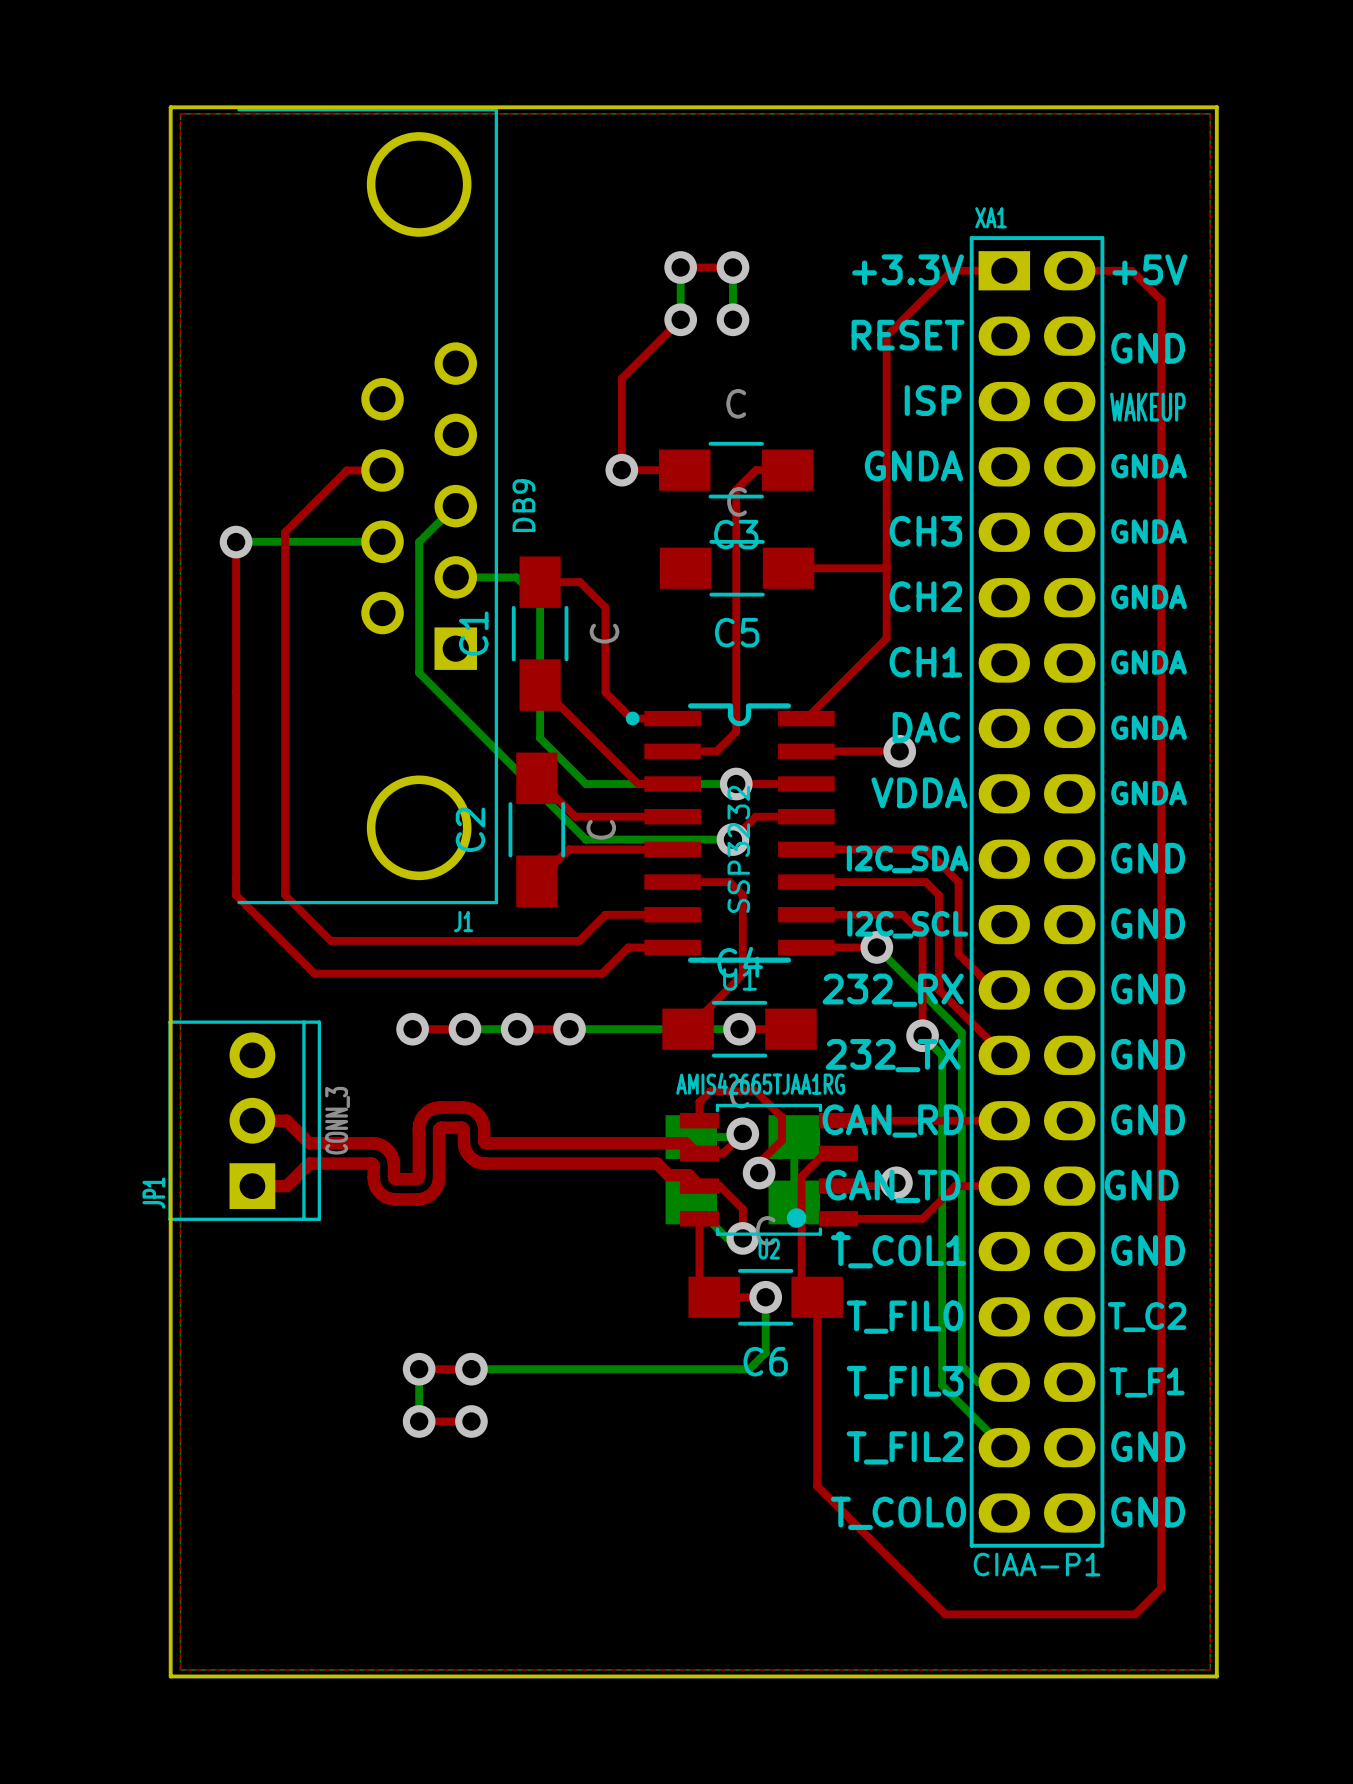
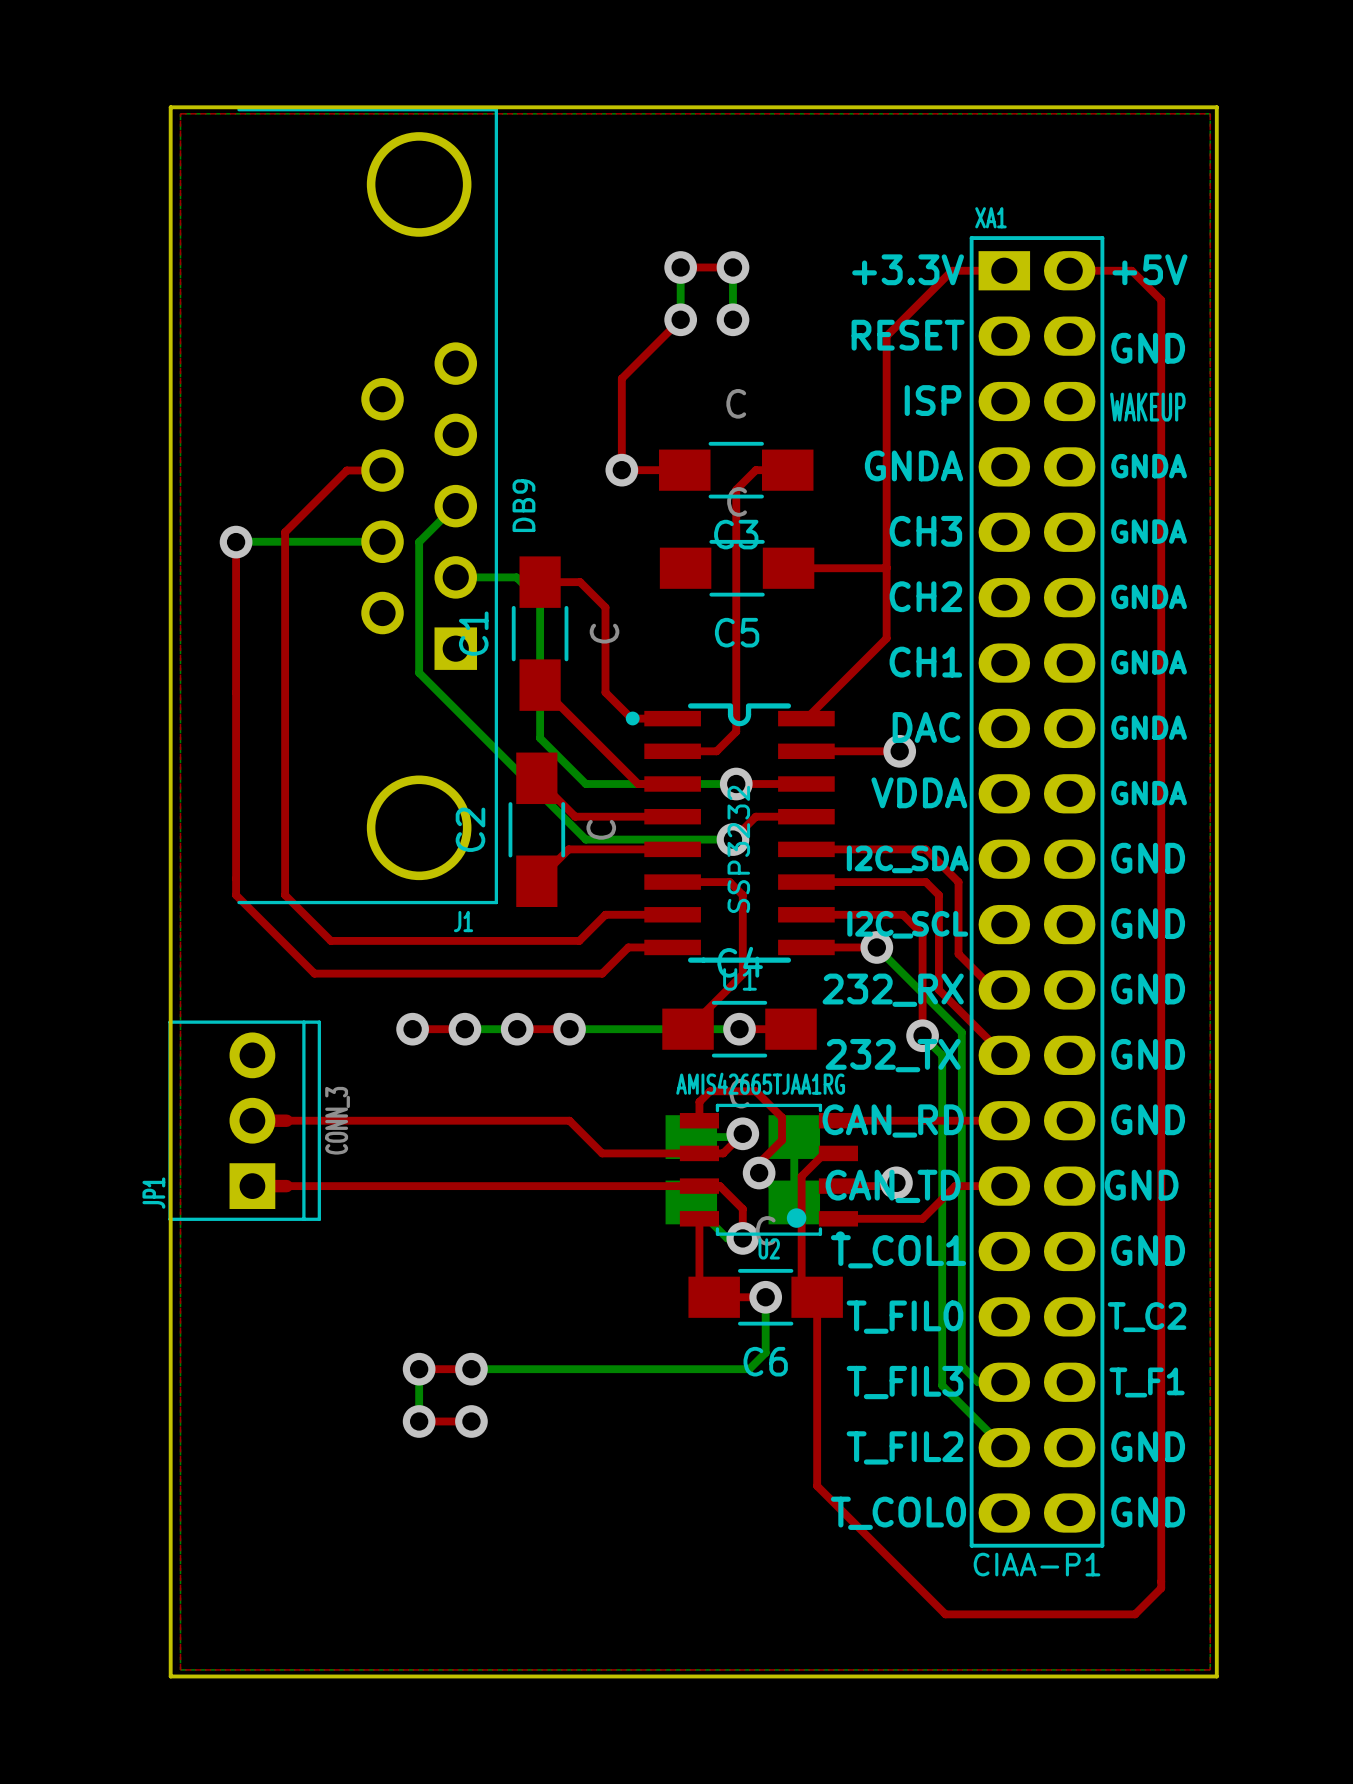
top track: (286, 1120) (309, 1143) (372, 1143) (381, 1145) (391, 1155) (394, 1177) (396, 1179) (418, 1177) (419, 1124) (426, 1112) (440, 1107) (467, 1107) (476, 1112) (483, 1124) (484, 1141) (486, 1143) (685, 1143) (695, 1153) -> (286, 1120) (569, 1120) (602, 1153) (695, 1153)
top track: (286, 1186) (309, 1163) (370, 1163) (373, 1165) (375, 1187) (385, 1197) (395, 1199) (417, 1199) (426, 1197) (434, 1191) (438, 1182) (439, 1130) (441, 1127) (462, 1128) (466, 1151) (472, 1158) (480, 1163) (656, 1163) (668, 1175) (688, 1175) (699, 1186) -> (286, 1186) (699, 1186)

